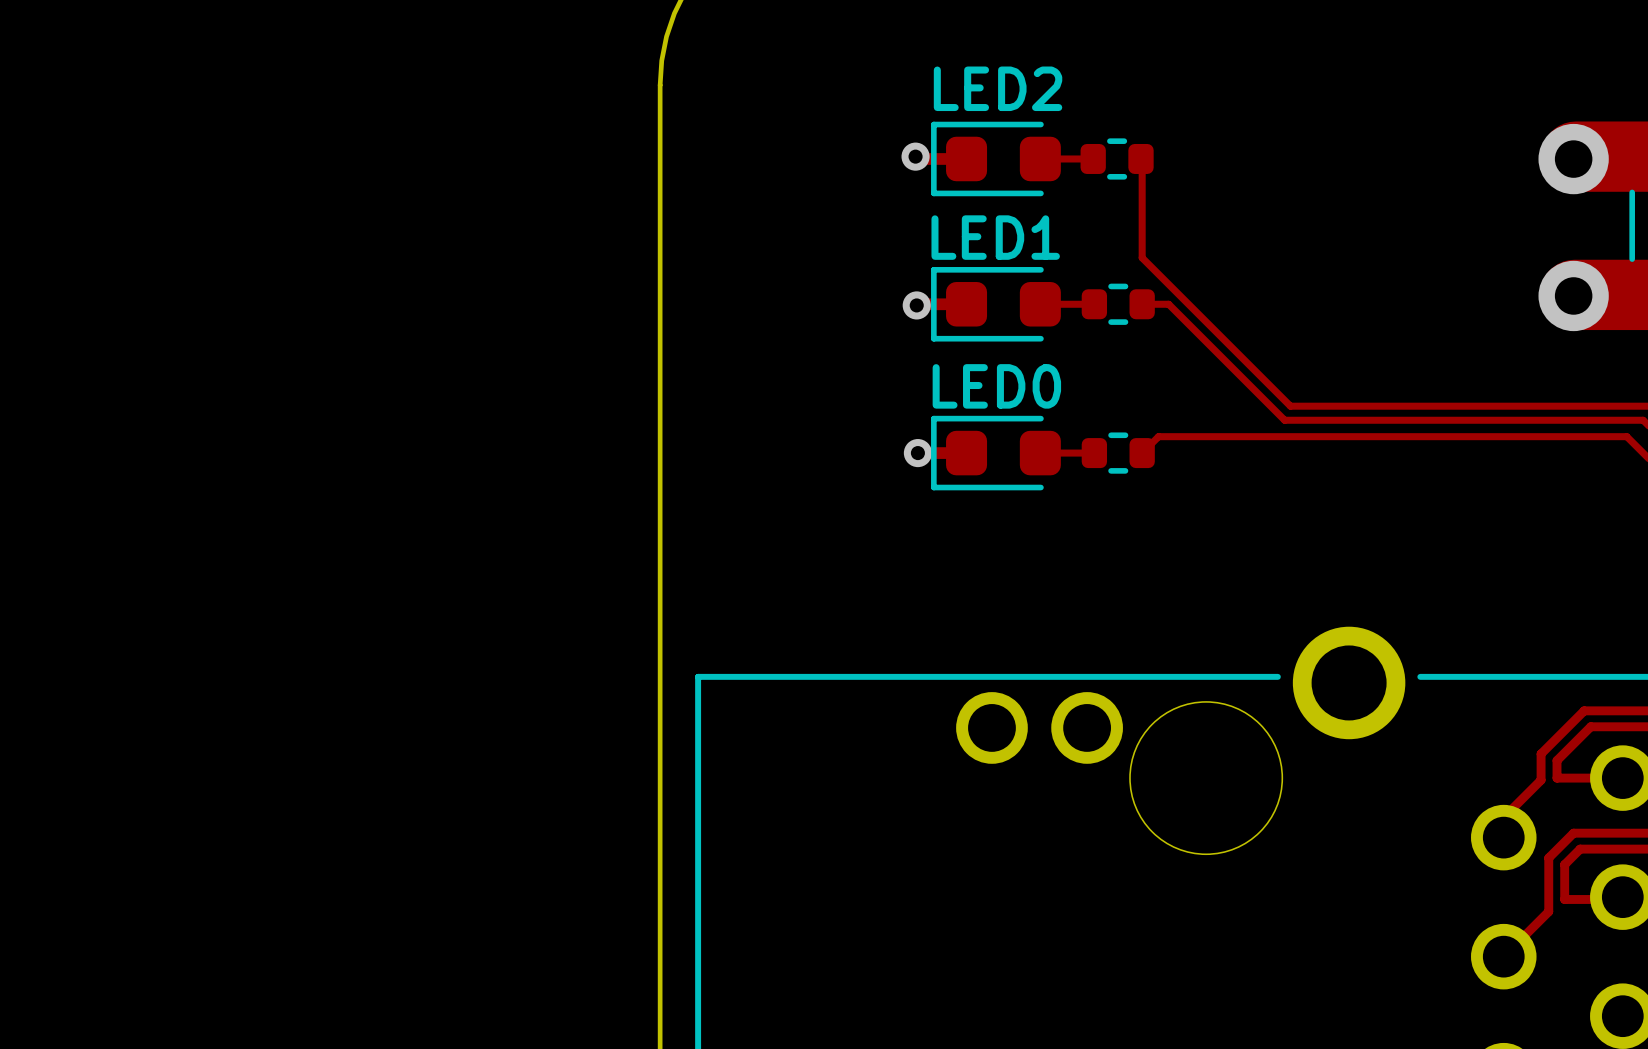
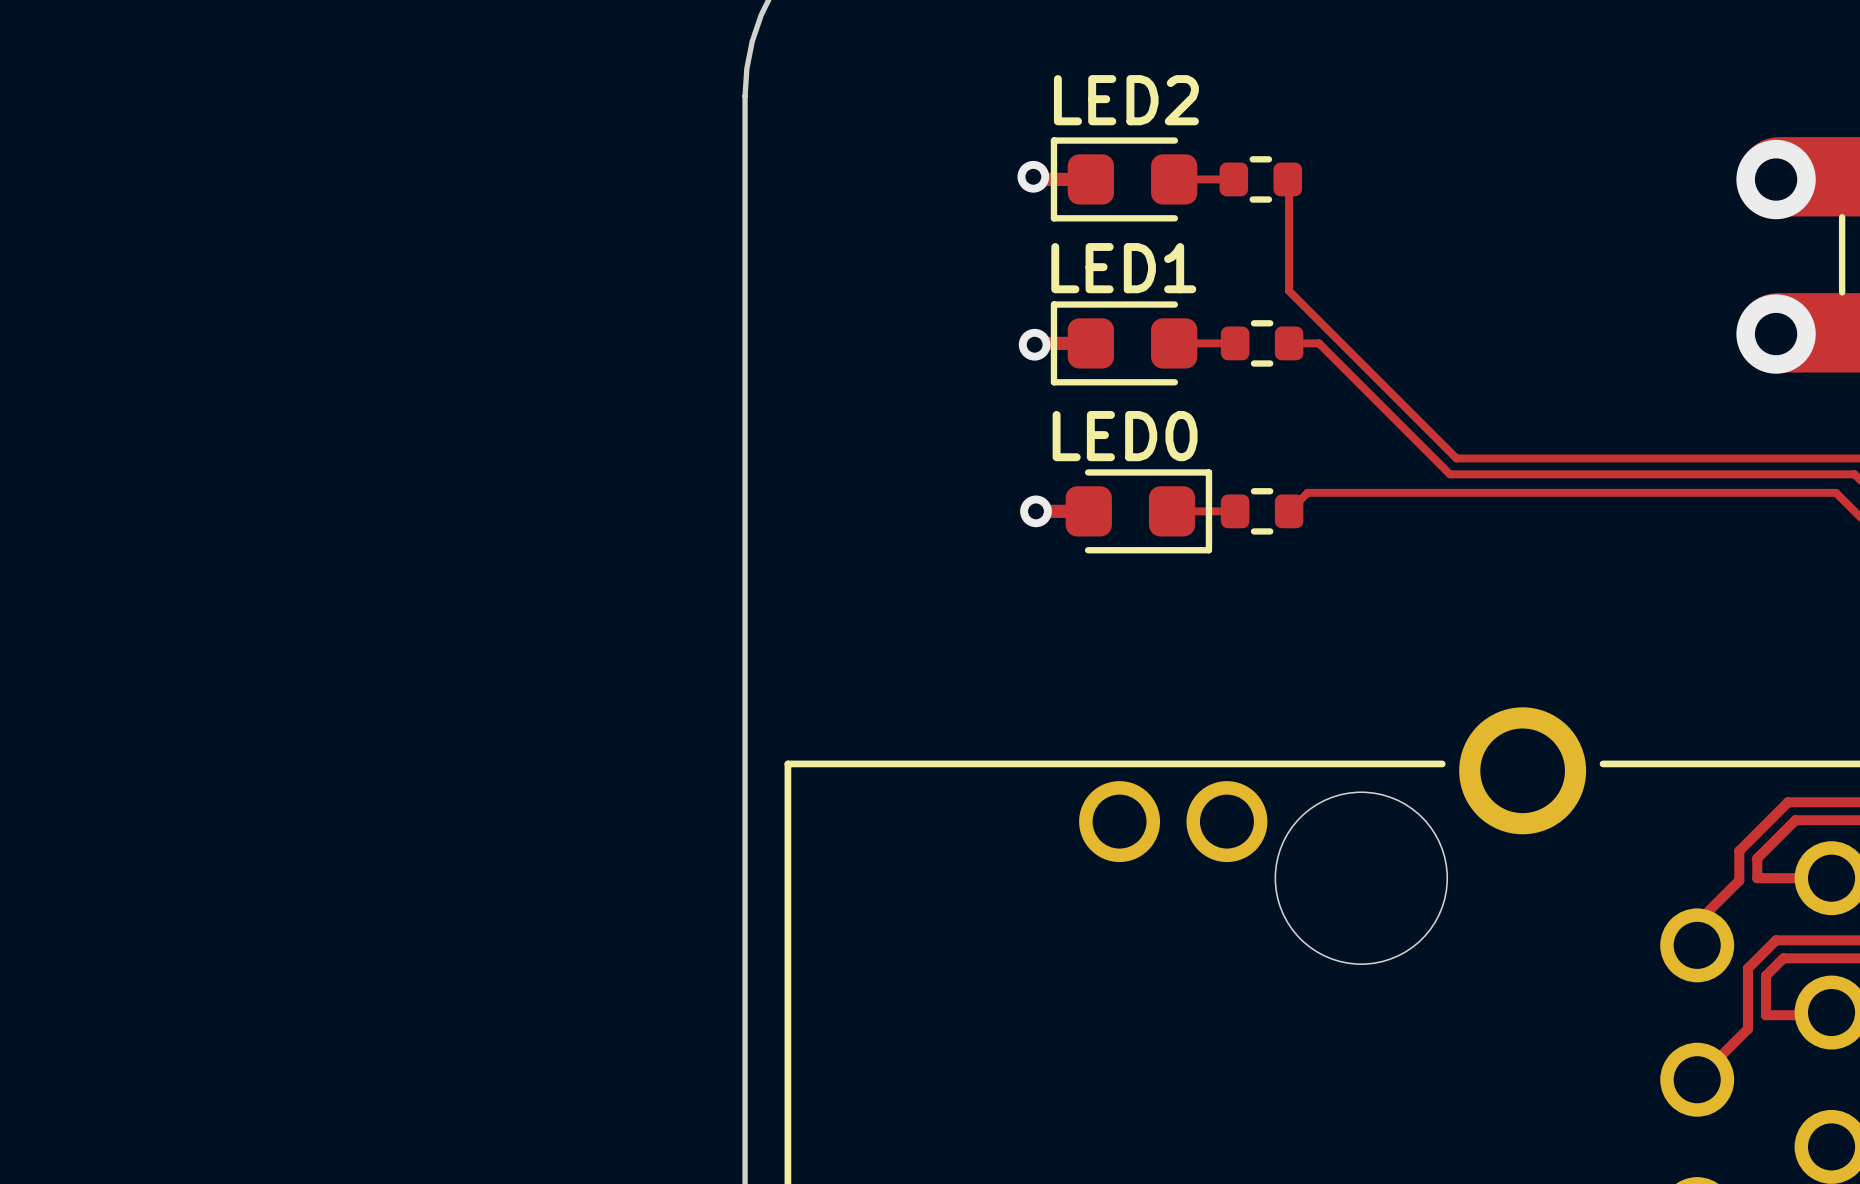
part rotation: 0° (995, 453) -> 180° (1138, 511)

